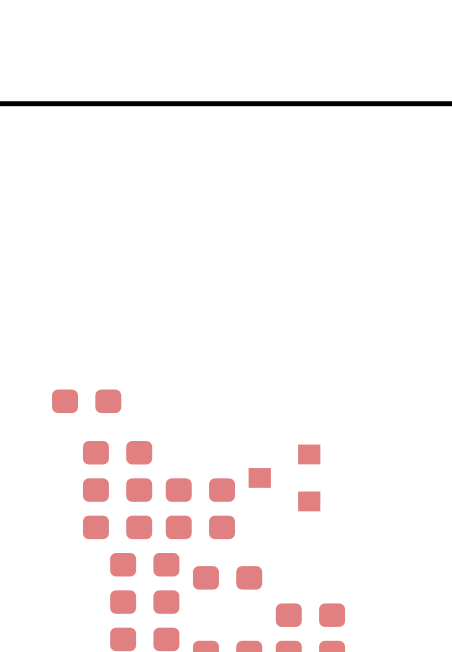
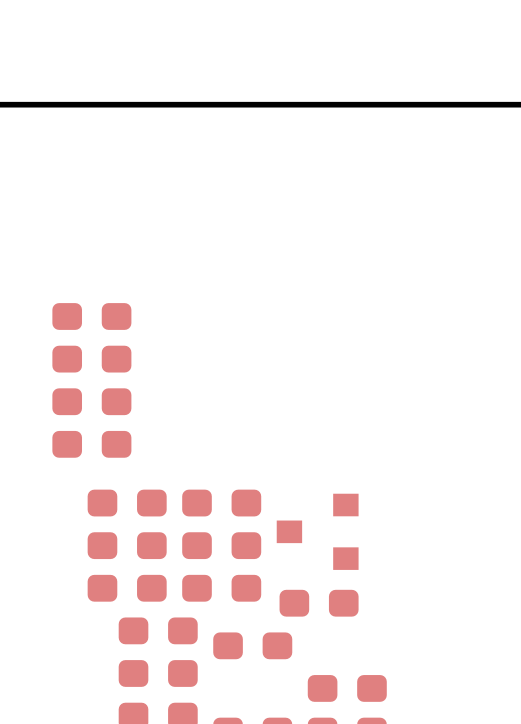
part: none -> (91, 316)
part: none -> (91, 359)
part: none -> (91, 401)
part: none -> (221, 503)
part: none -> (319, 603)

